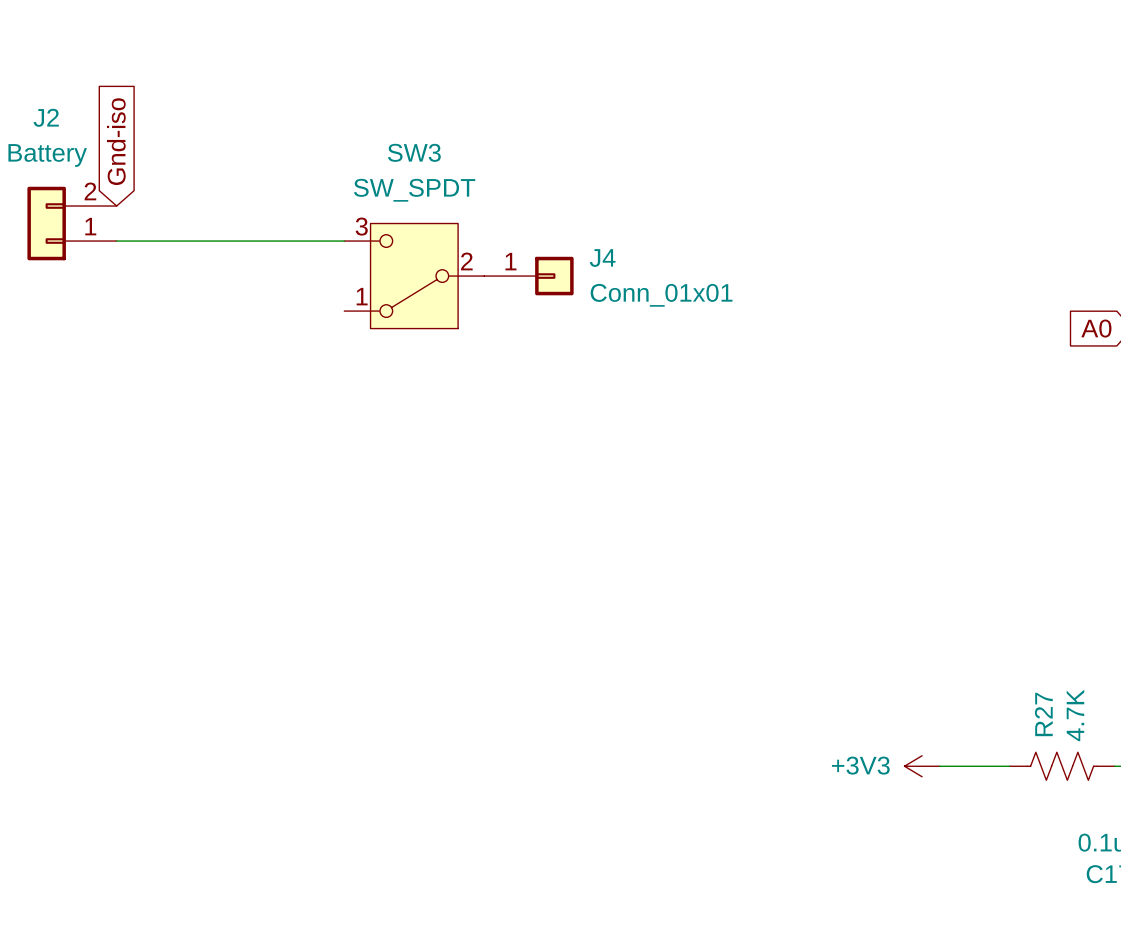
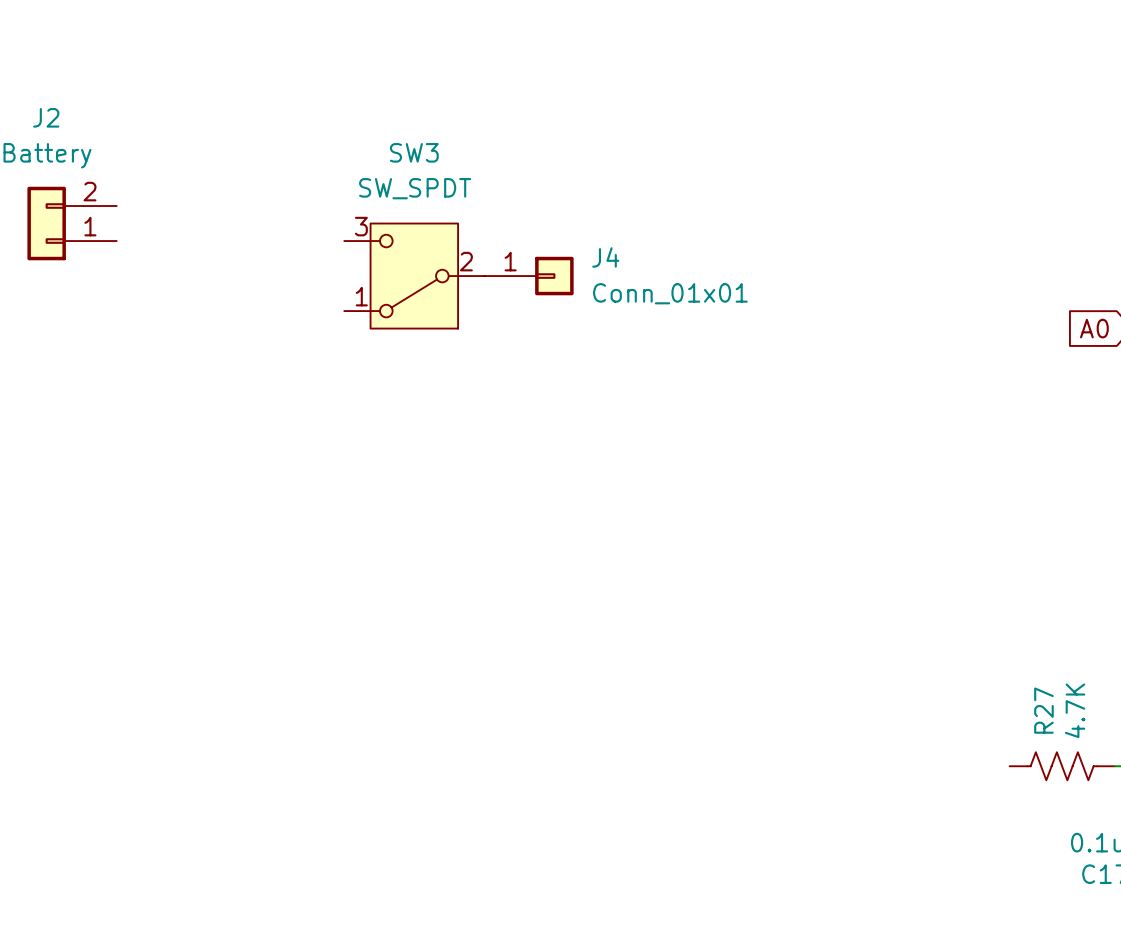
global label: Gnd-iso (116, 141) -> none
wire: (116, 241) (344, 241) -> none
power symbol: +3V3 (922, 766) -> none
wire: (939, 766) (1009, 766) -> none

